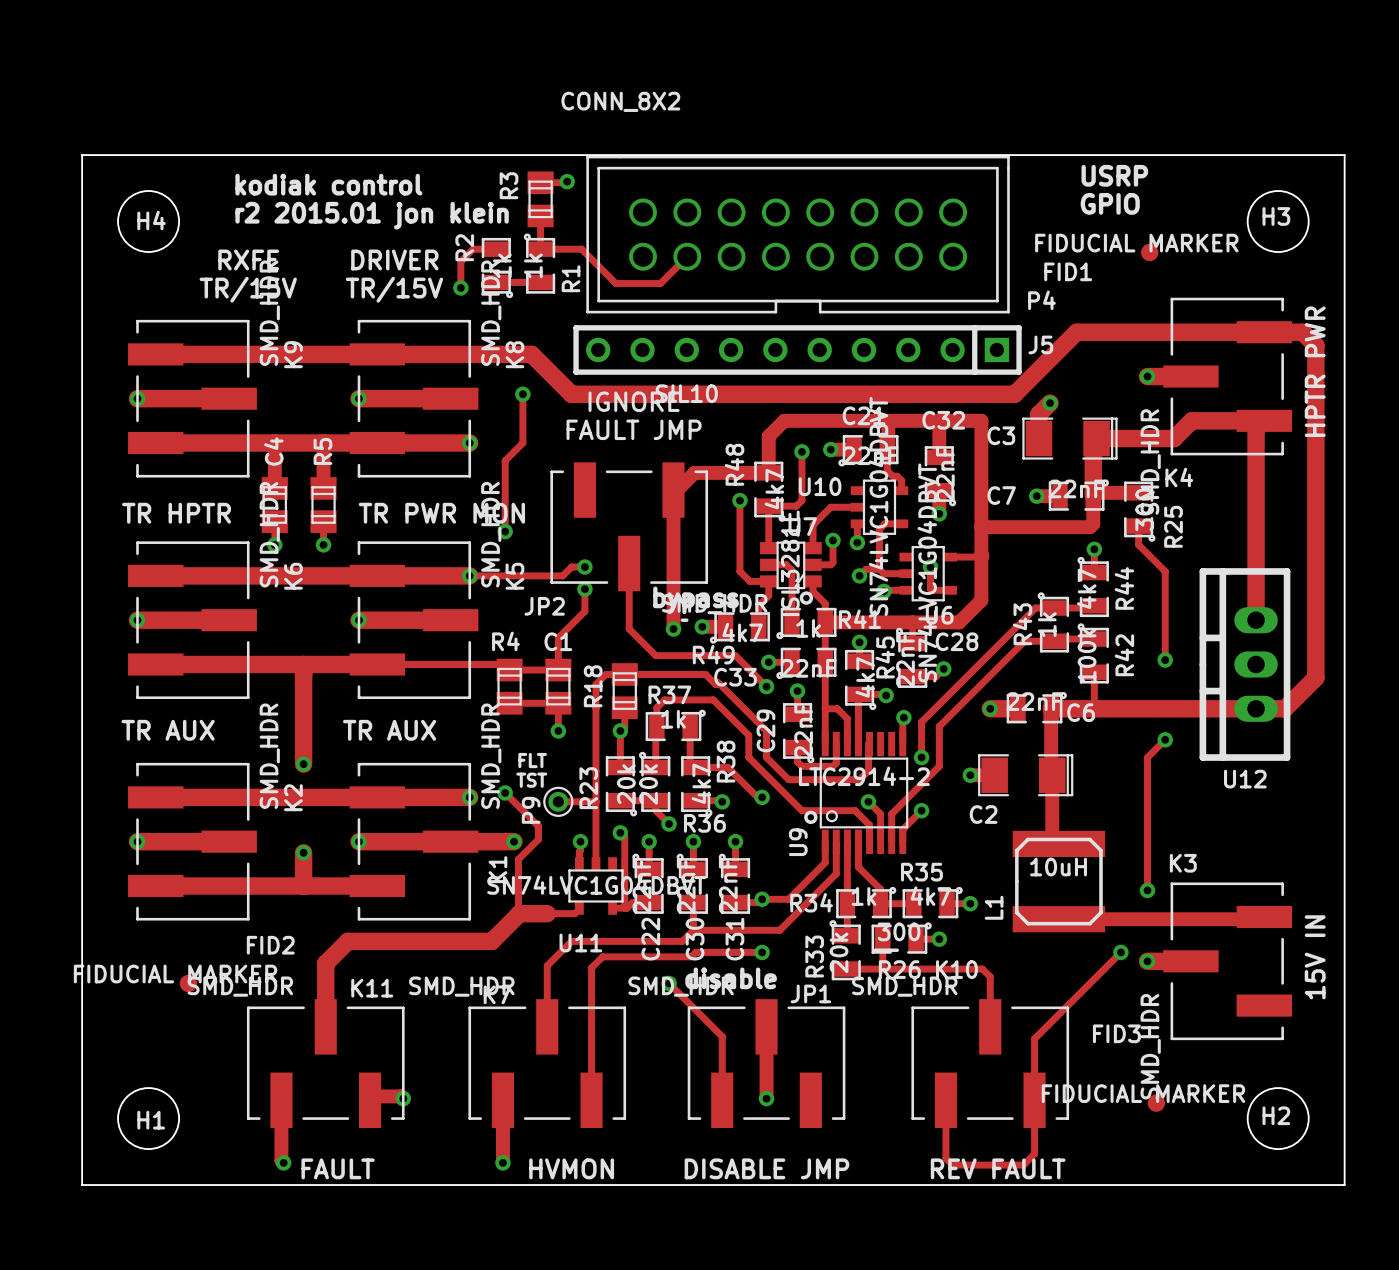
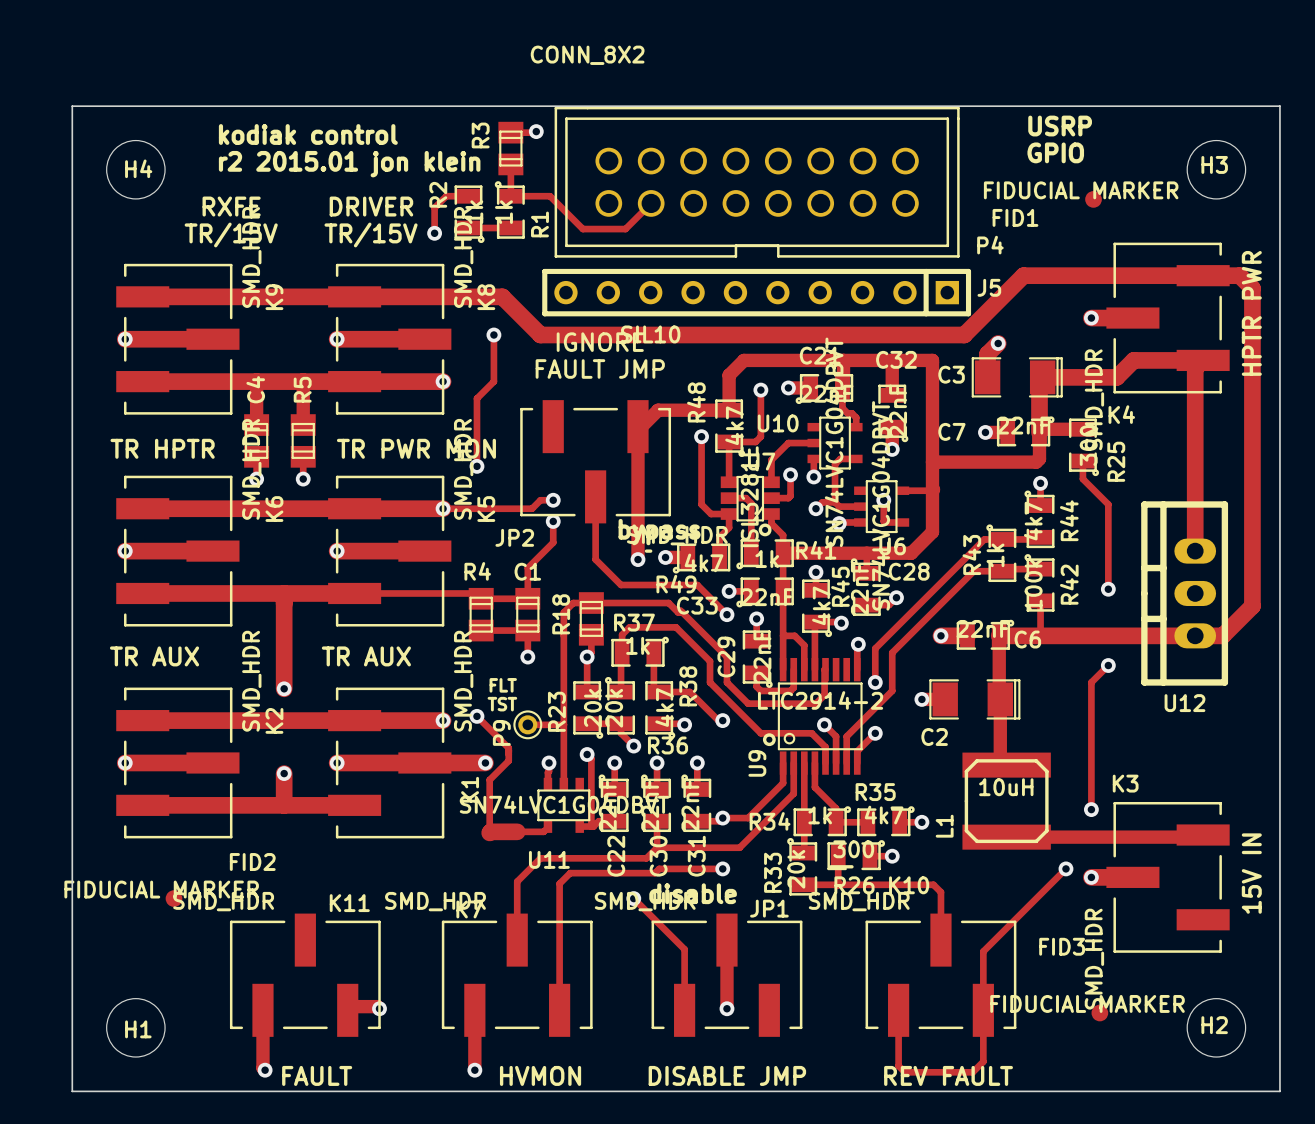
track: (518, 914) (491, 941) (347, 941) (325, 963) (325, 1029) -> none

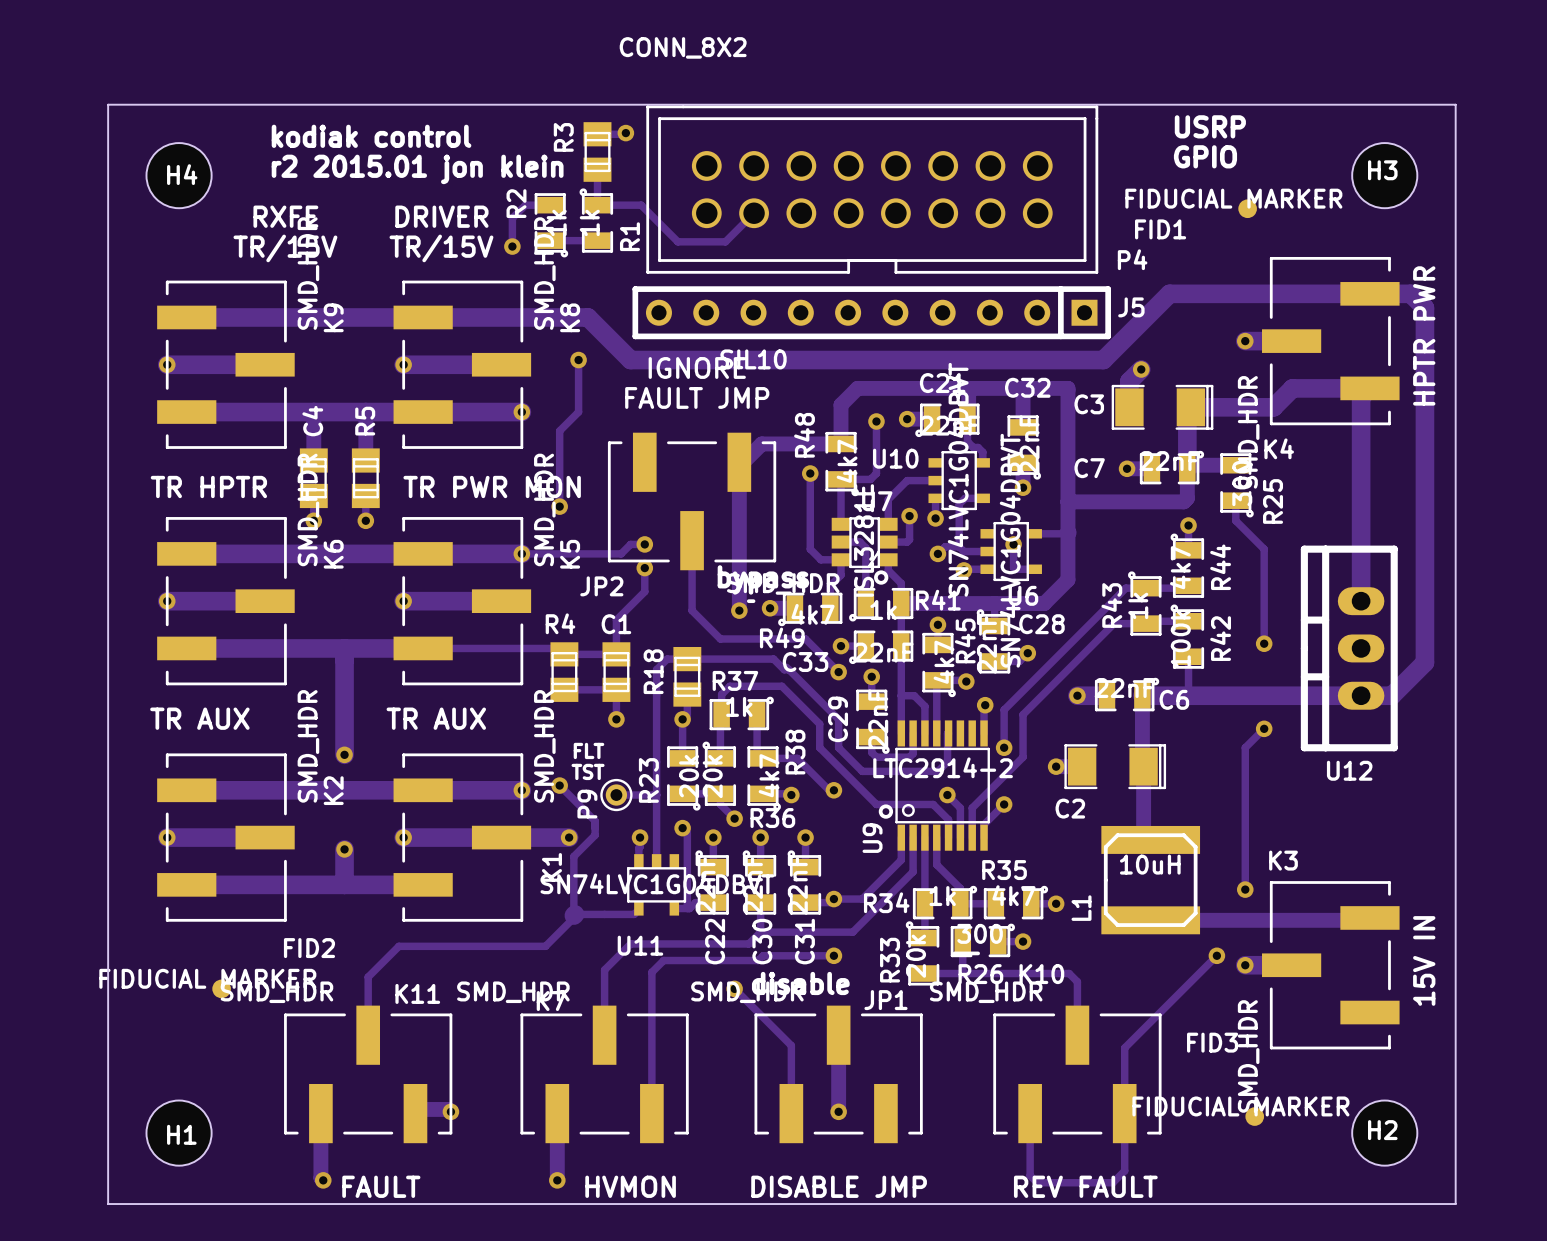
track width: thick (490, 831) (517, 831) -> thin (575, 914) (604, 914)
track: none -> (573, 915) (573, 917) (545, 946) (398, 946) (368, 977) (368, 1035)

